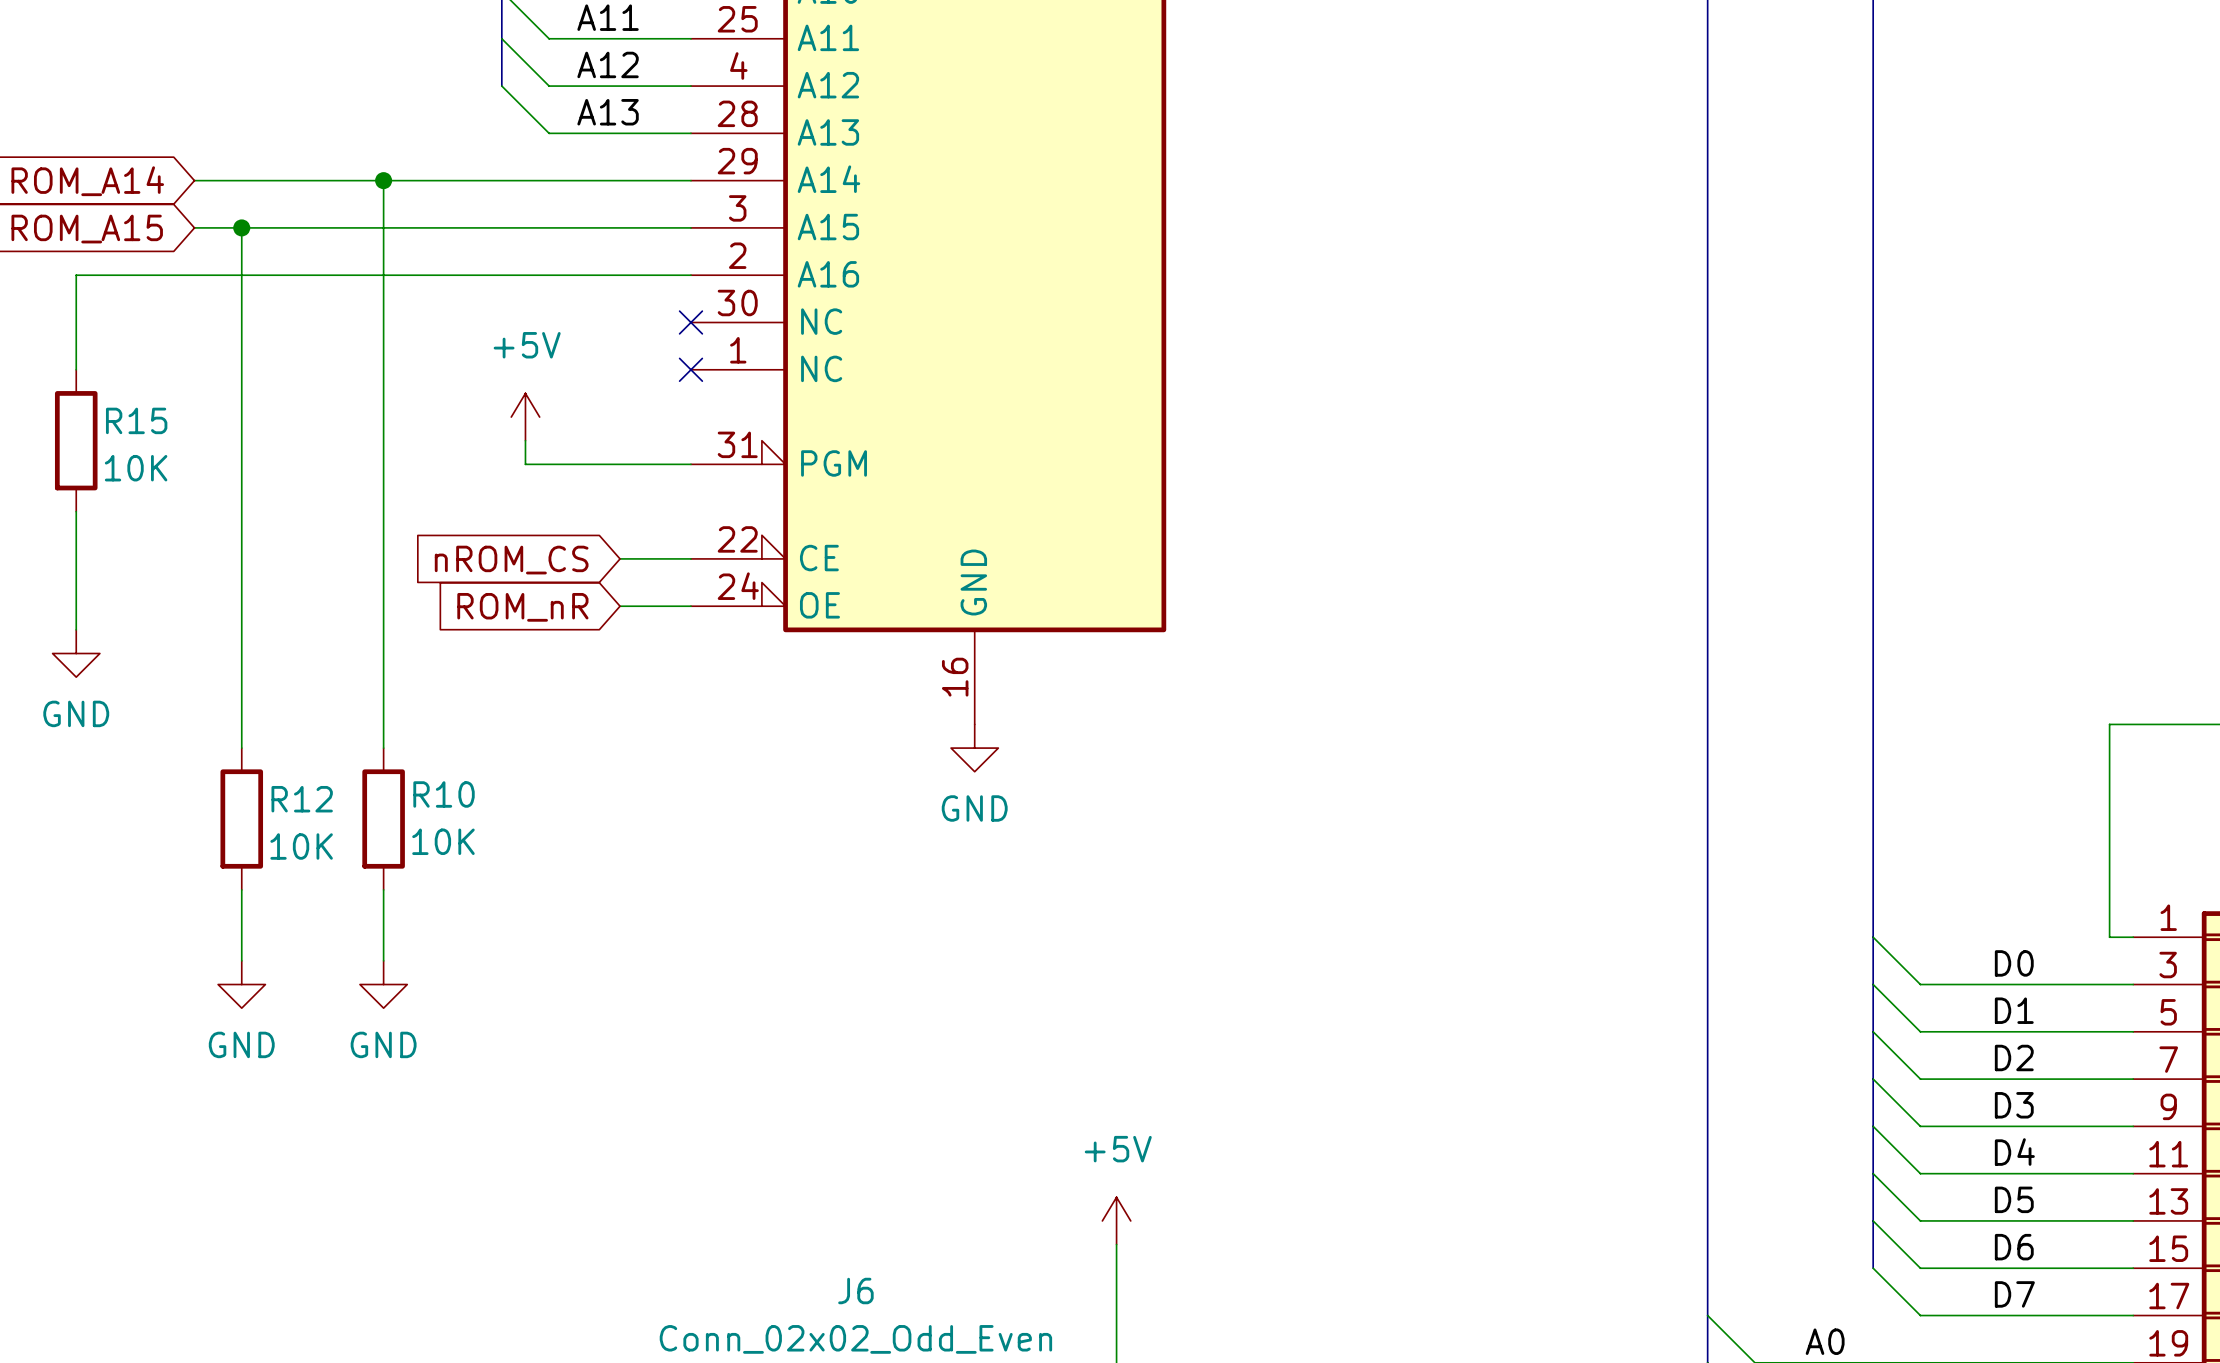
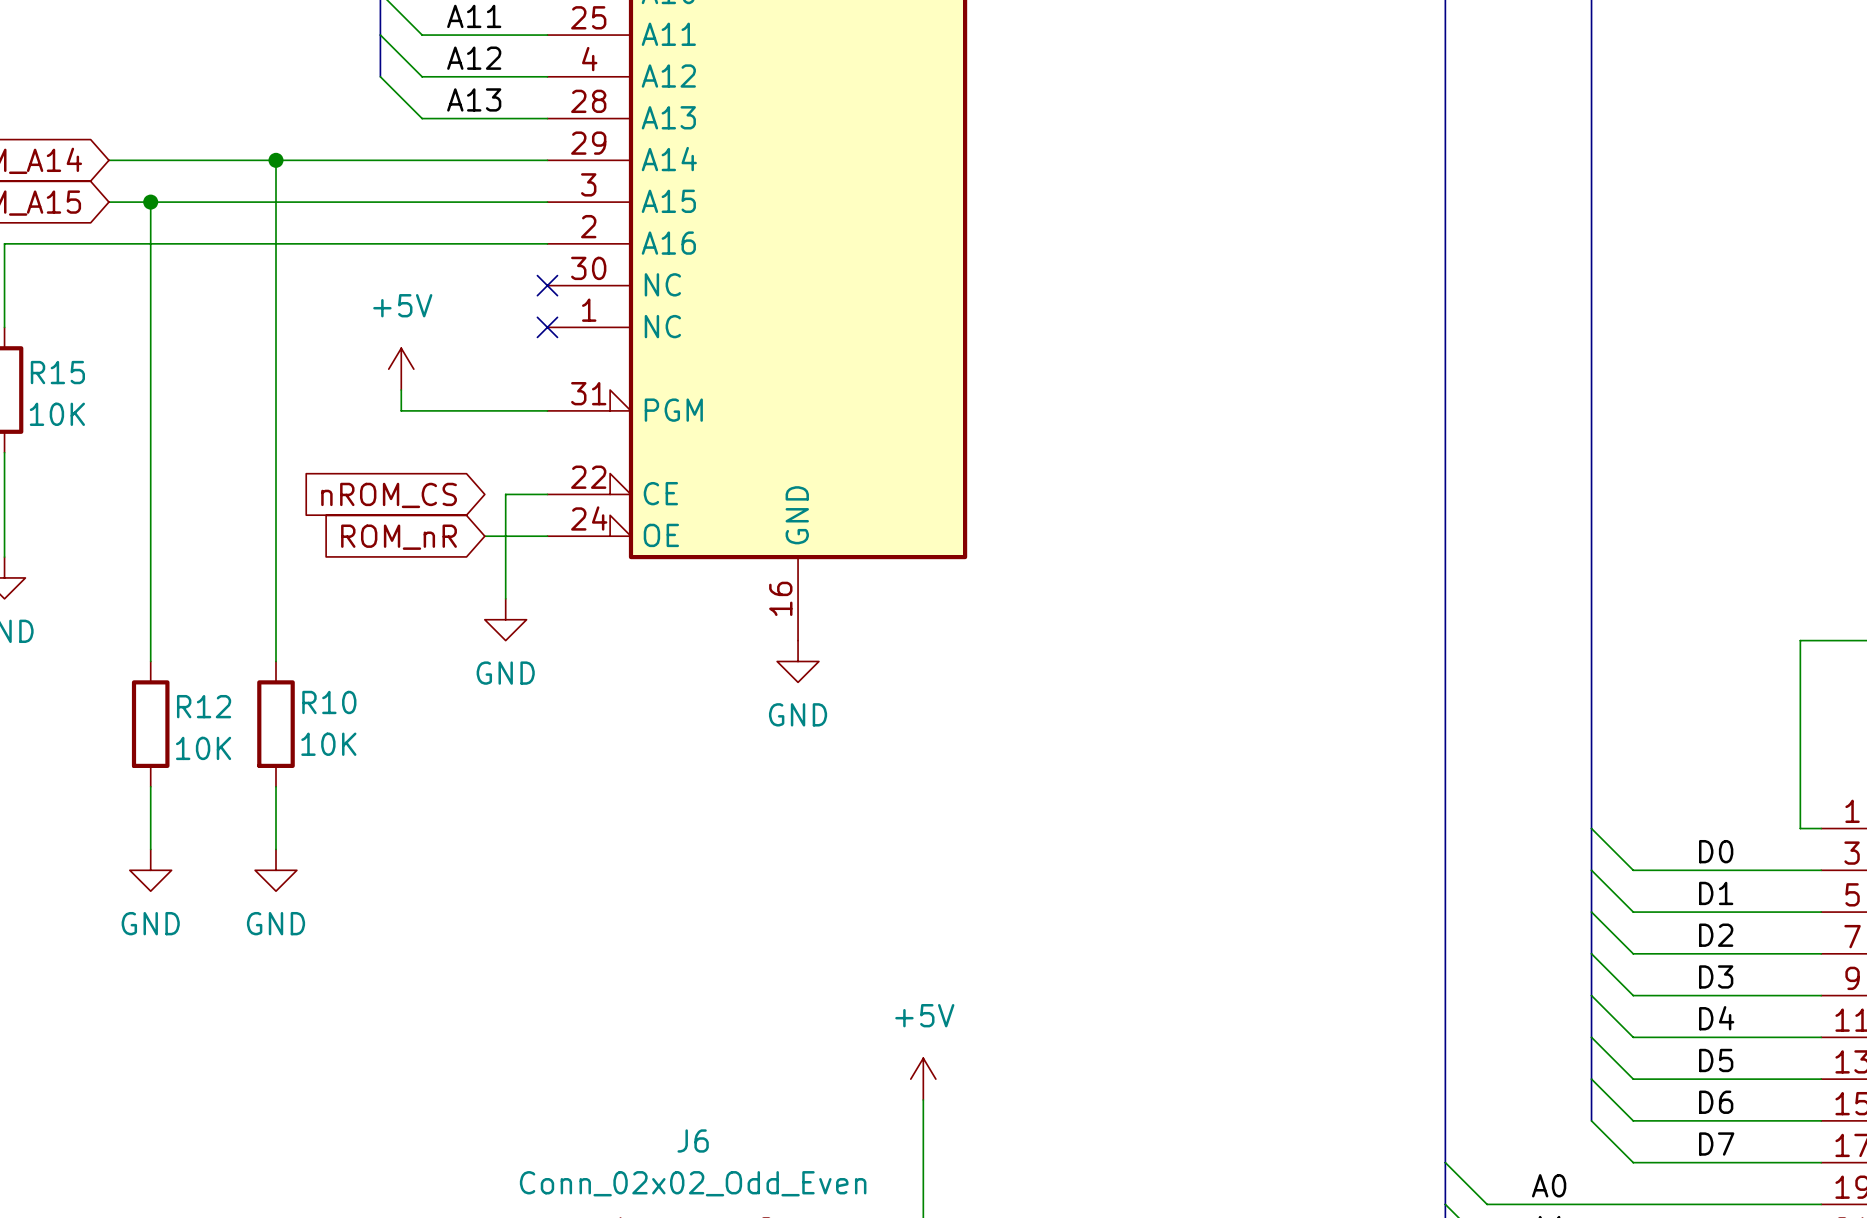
wire: (620, 558) (643, 558) -> (505, 598) (505, 494)
power symbol: none -> GND (505, 619)

